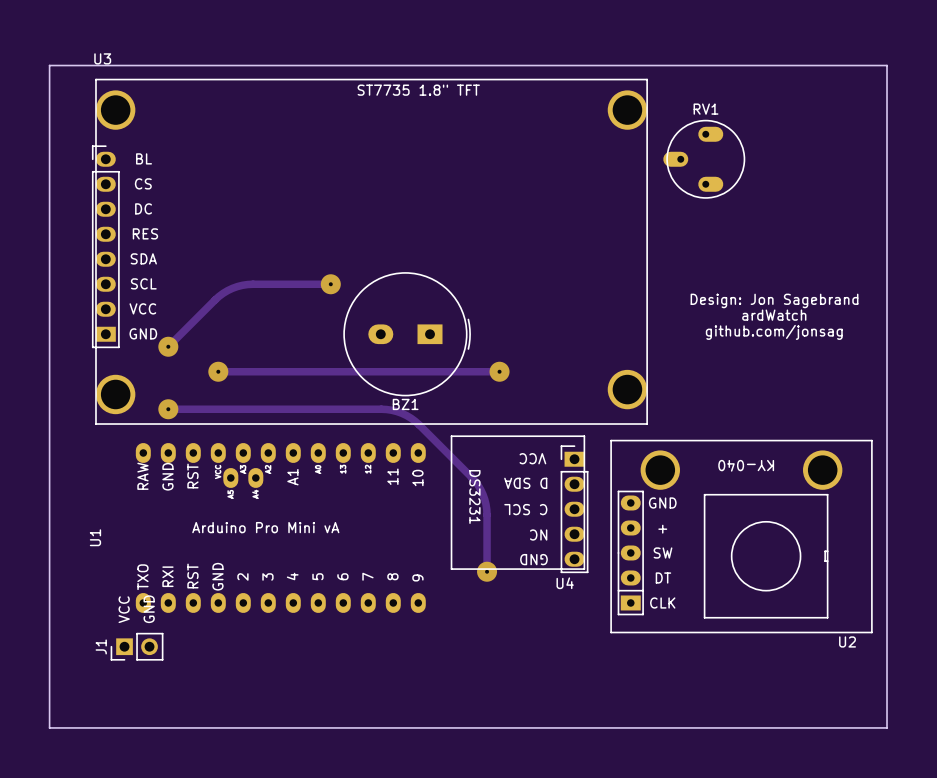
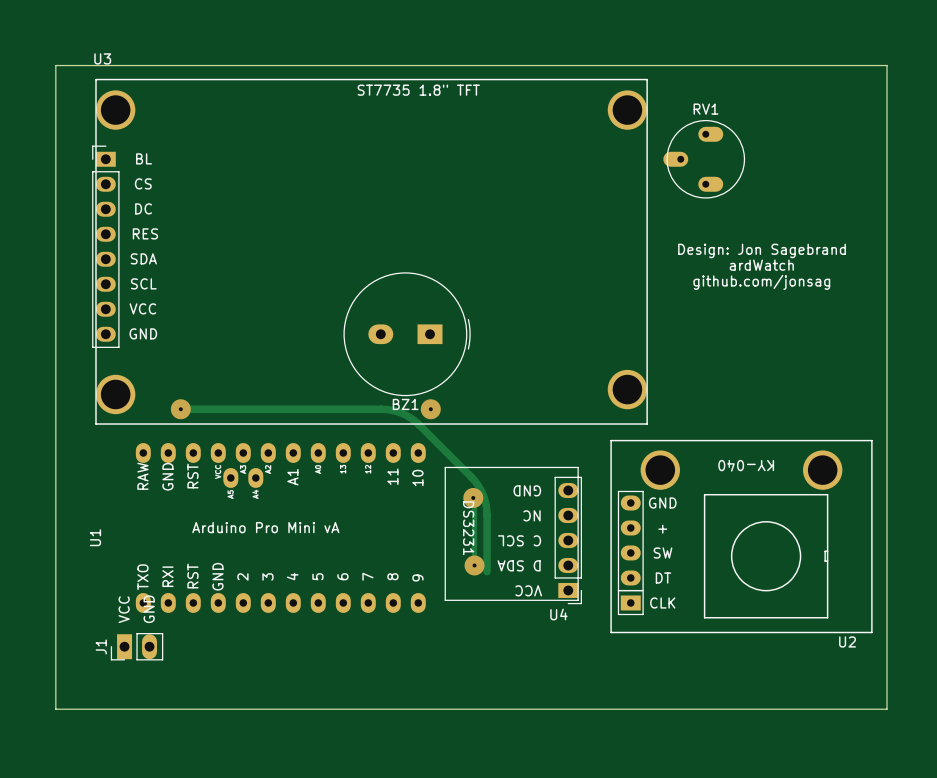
board edge: (55, 65) (49, 65) (49, 727) (887, 727) (887, 709) -> (55, 65) (55, 709) (887, 709)
U3 footprint: [92, 78, 648, 425] -> [92, 78, 648, 425]
track: (330, 284) (253, 284) (232, 288) (215, 299) (168, 346) -> none
via: (330, 284) -> none
text position: Design: Jon Sagebrand (774, 300) -> Design: Jon Sagebrand (762, 250)
text position: ardWatch (774, 315) -> ardWatch (761, 265)
text position: github.com/jonsag (774, 332) -> github.com/jonsag (761, 282)
via: (168, 346) -> none
track: (218, 371) (499, 371) -> none
via: (218, 371) -> none
via: (499, 371) -> none
via position: (168, 409) -> (180, 409)
via: none -> (430, 409)
U4 footprint: [450, 435, 589, 573] -> [444, 466, 582, 605]
track: none -> (473, 497) (474, 565)
via: none -> (473, 497)
via position: (487, 571) -> (474, 565)
J1 footprint: [110, 633, 164, 661] -> [110, 633, 164, 661]

